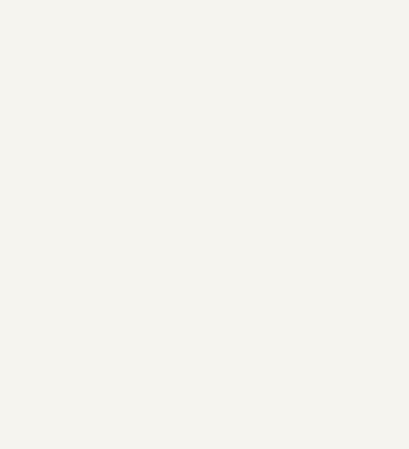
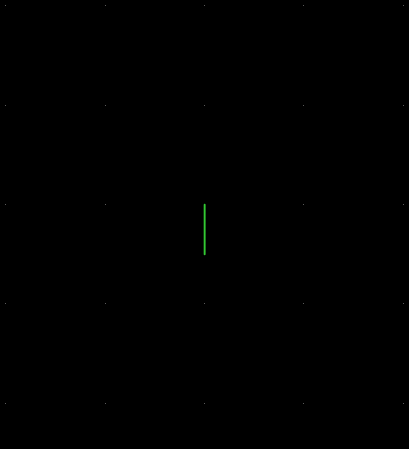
wire: none -> (204, 204) (204, 254)

